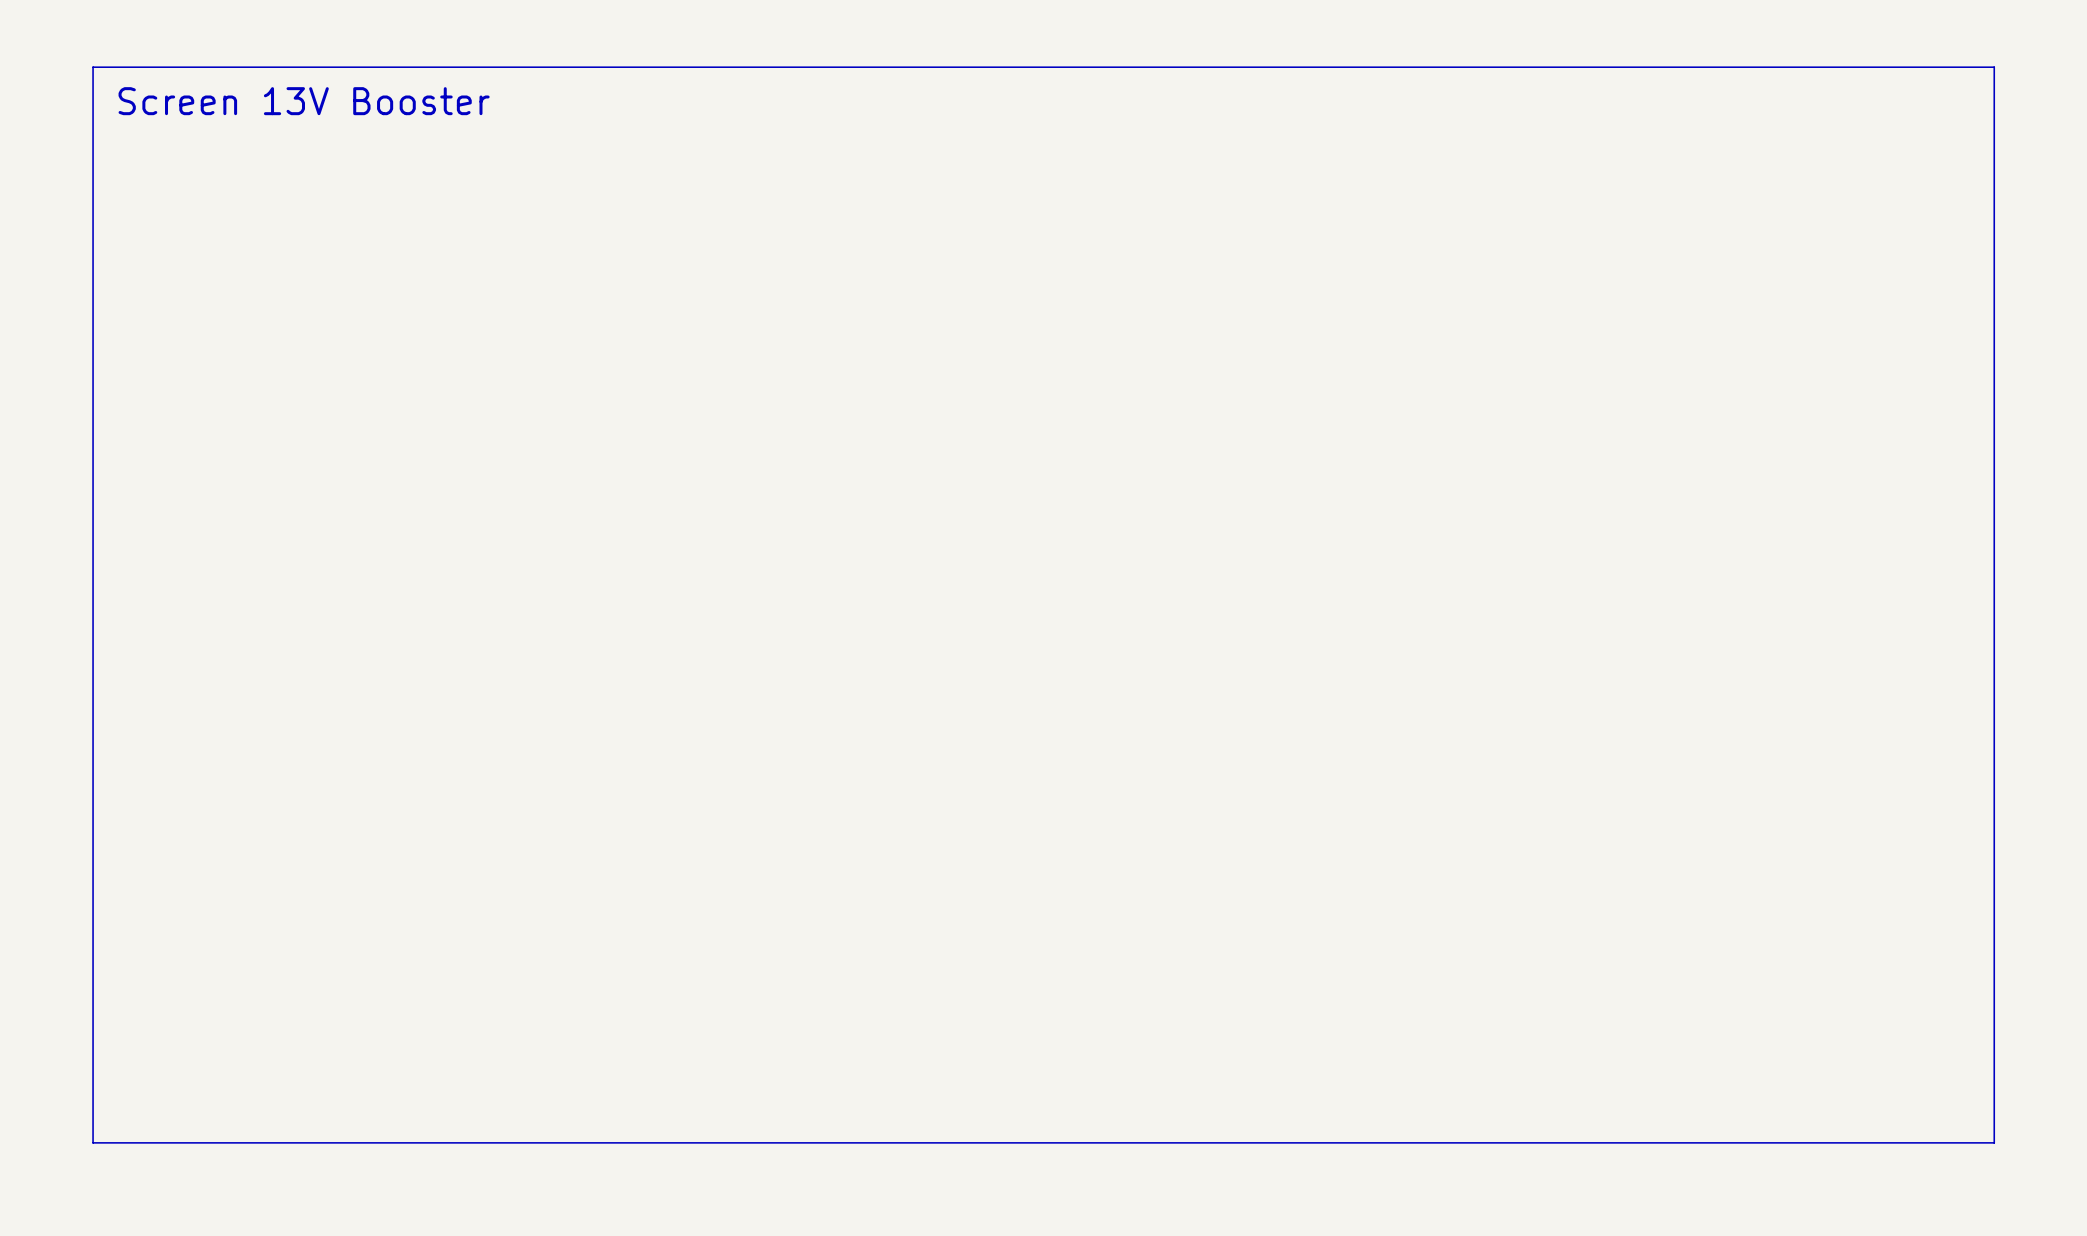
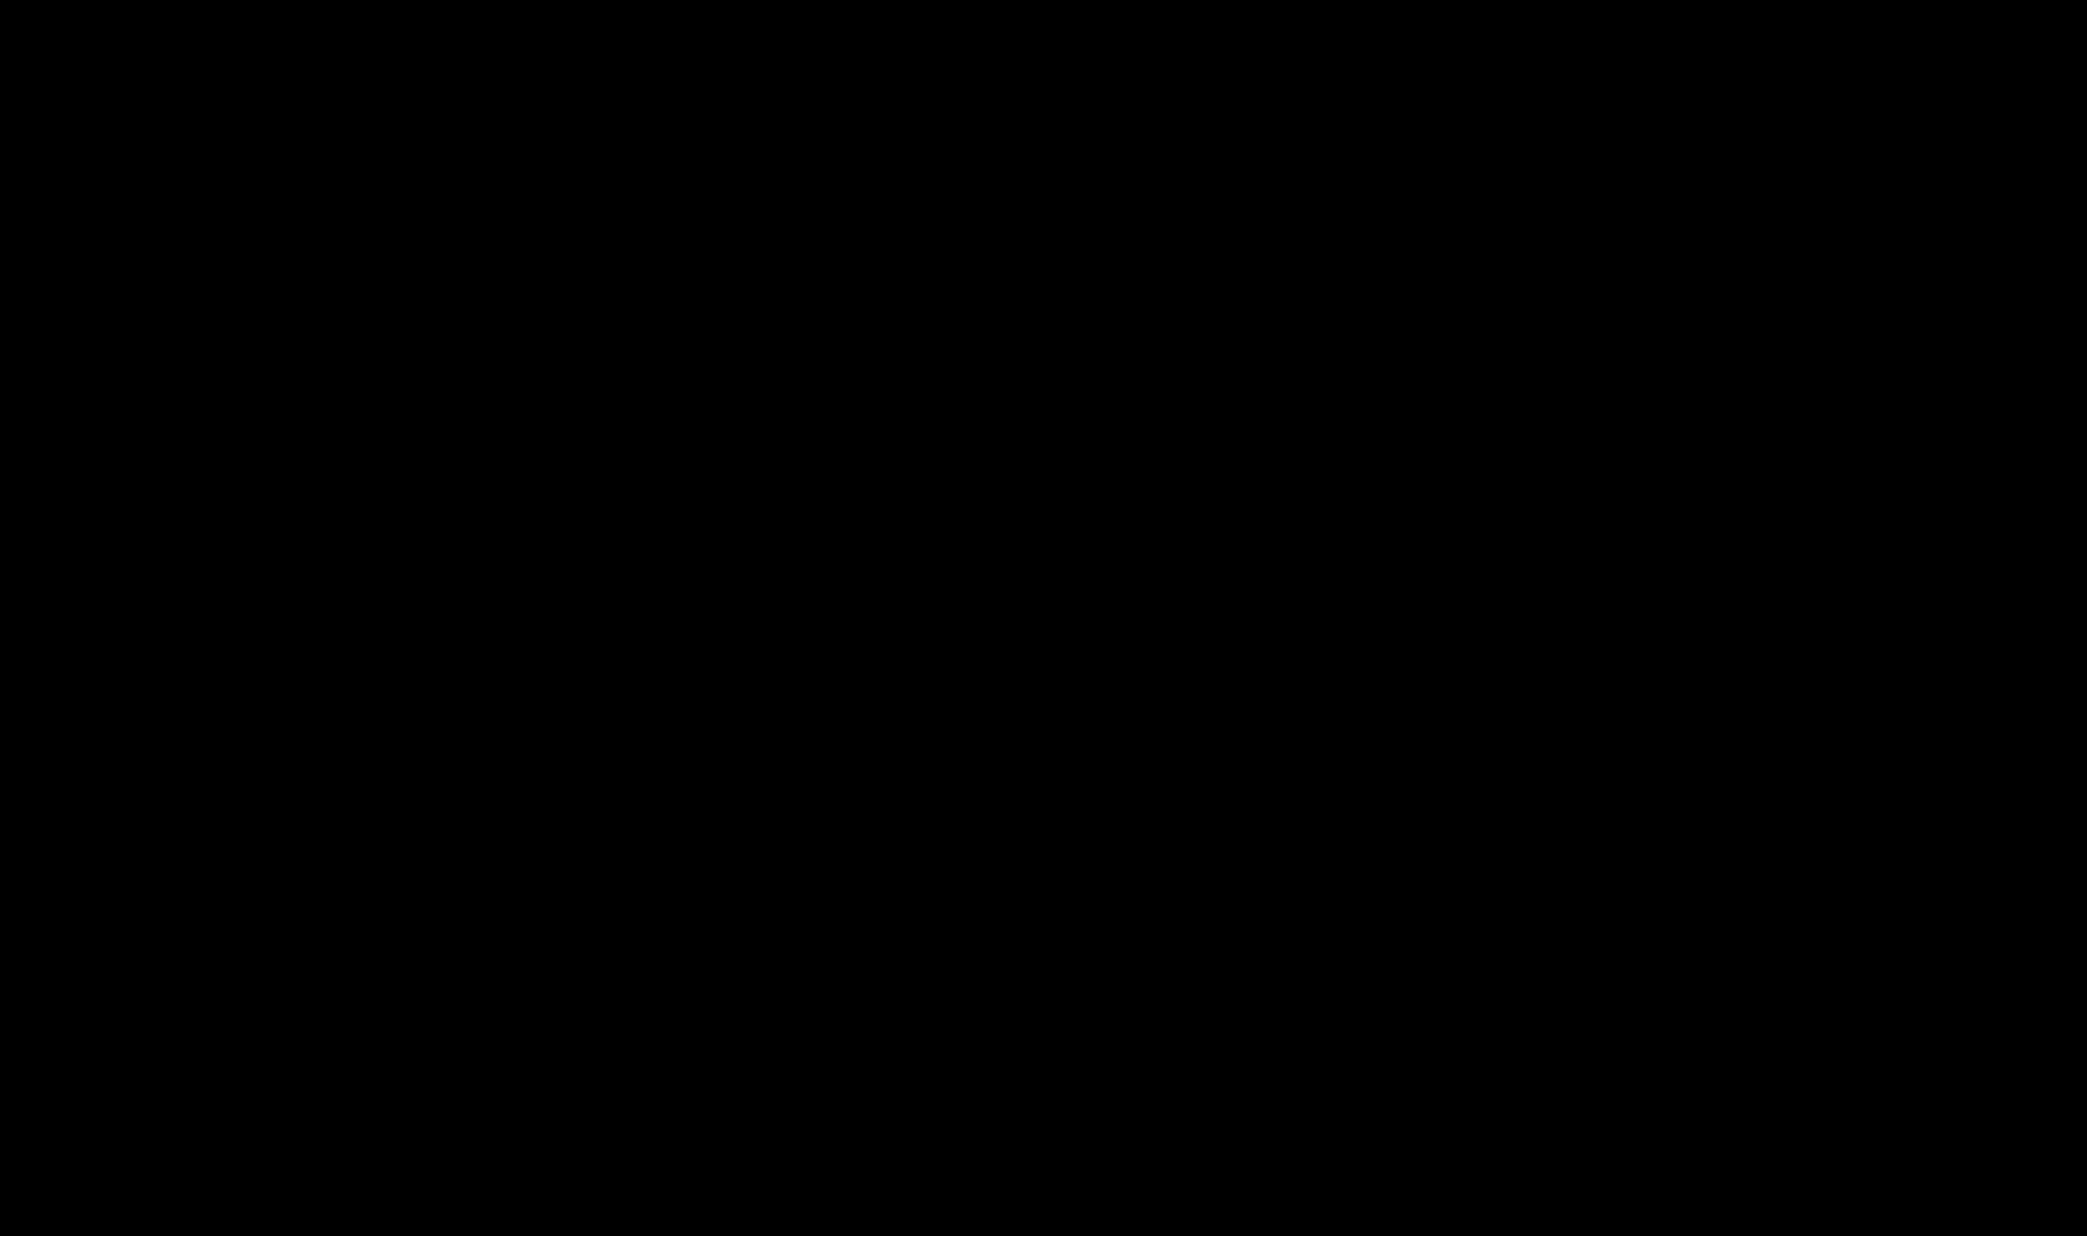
line: (93, 67) (1994, 67) (1994, 1142) (93, 1142) (93, 67) -> none
text: Screen 13V Booster (304, 101) -> none

